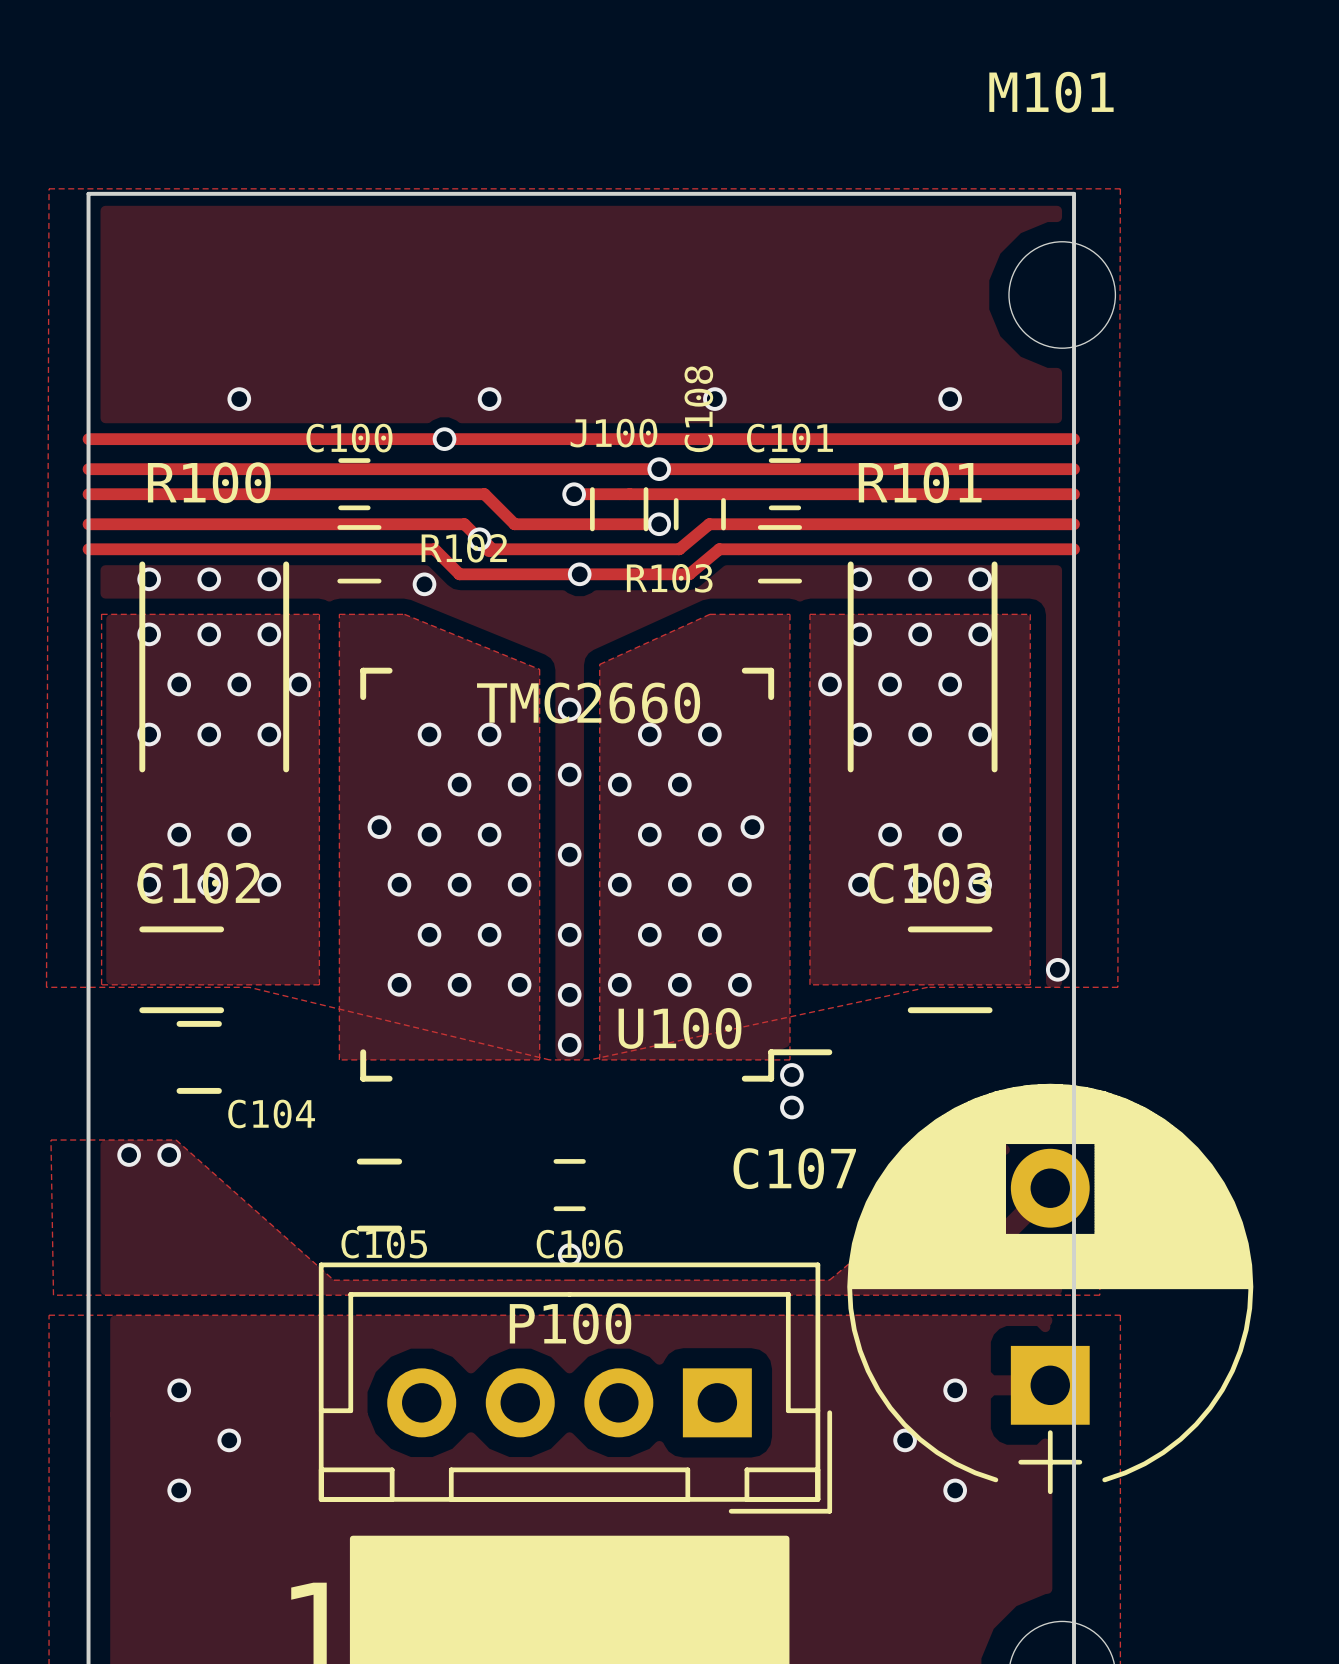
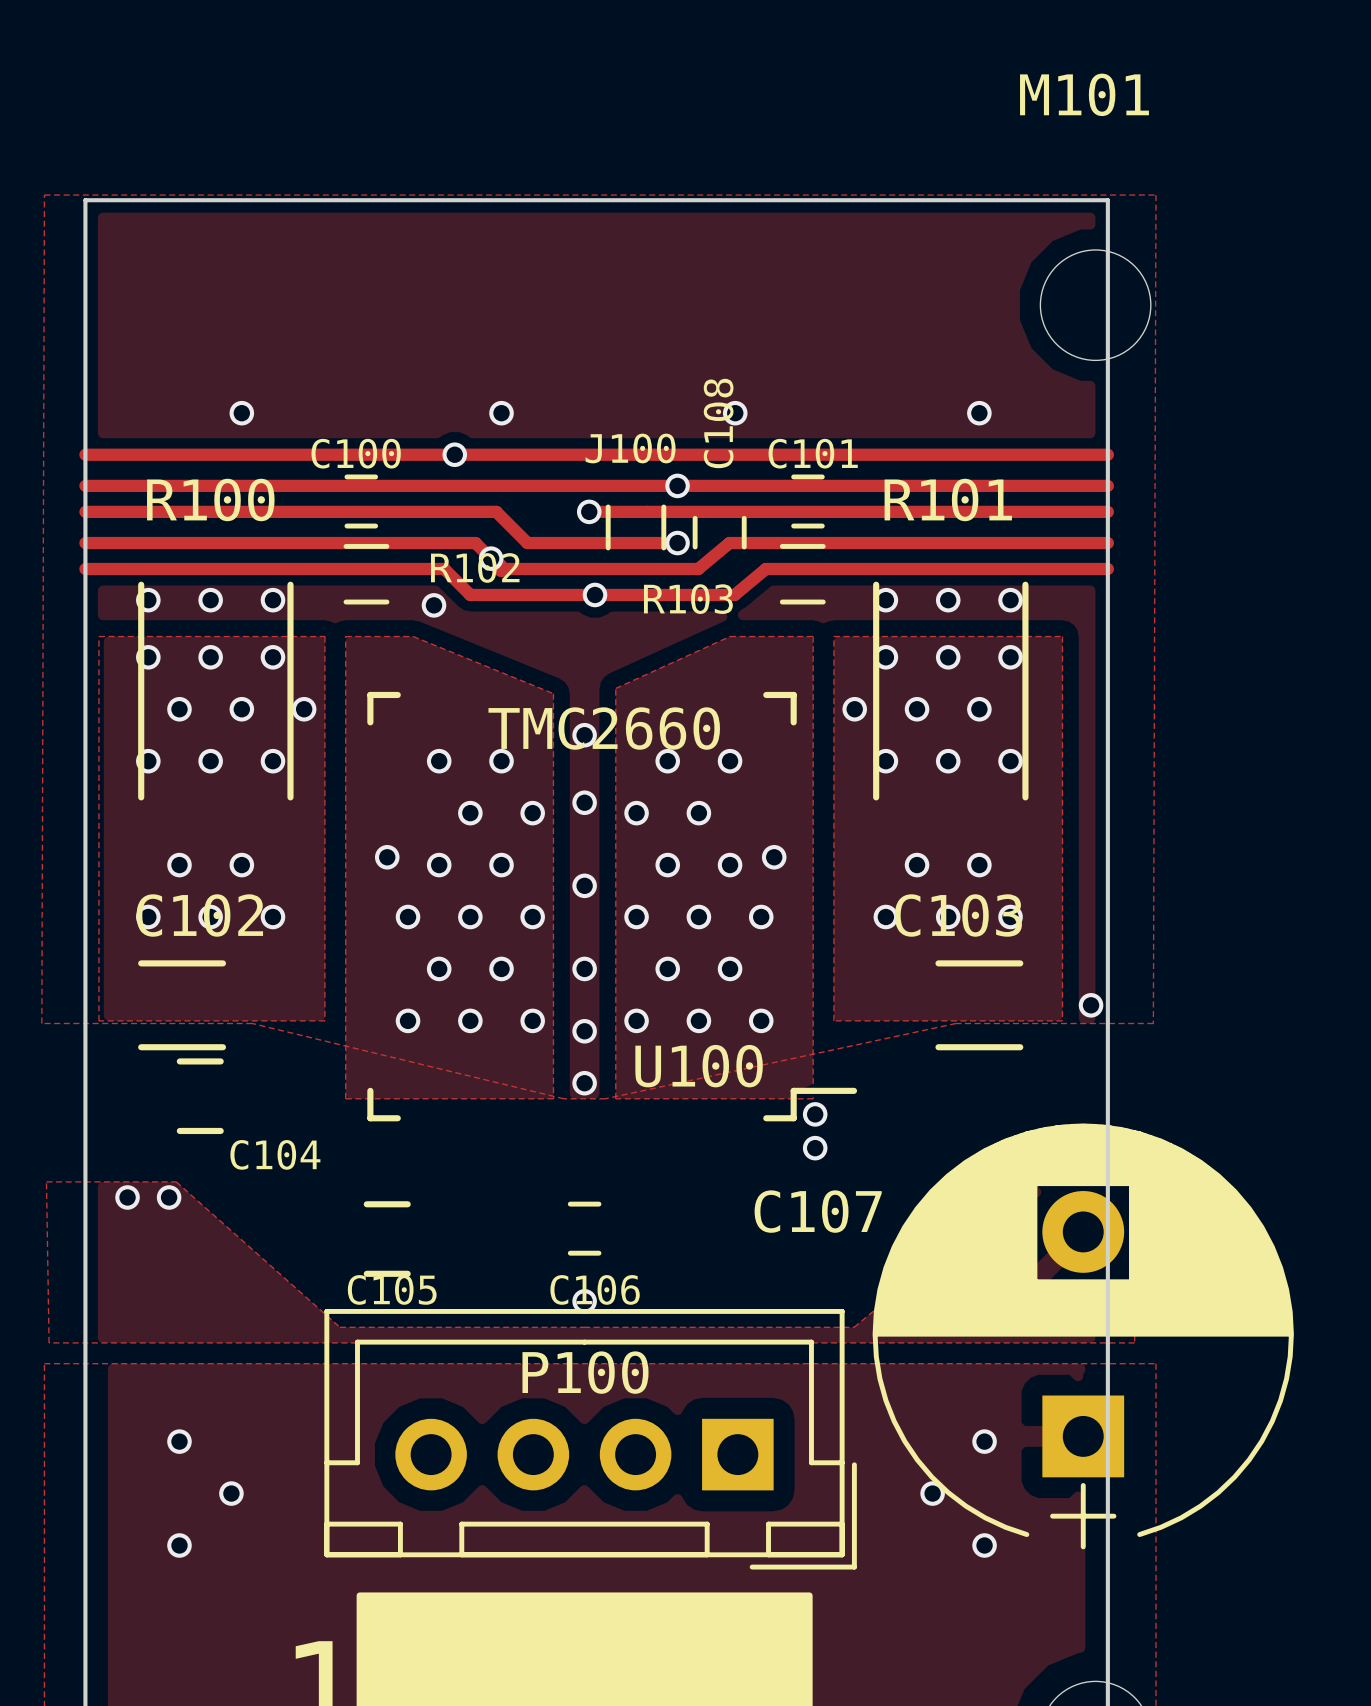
track: (744, 549) (719, 549) (689, 574) -> (765, 569) (734, 594) (708, 594)

